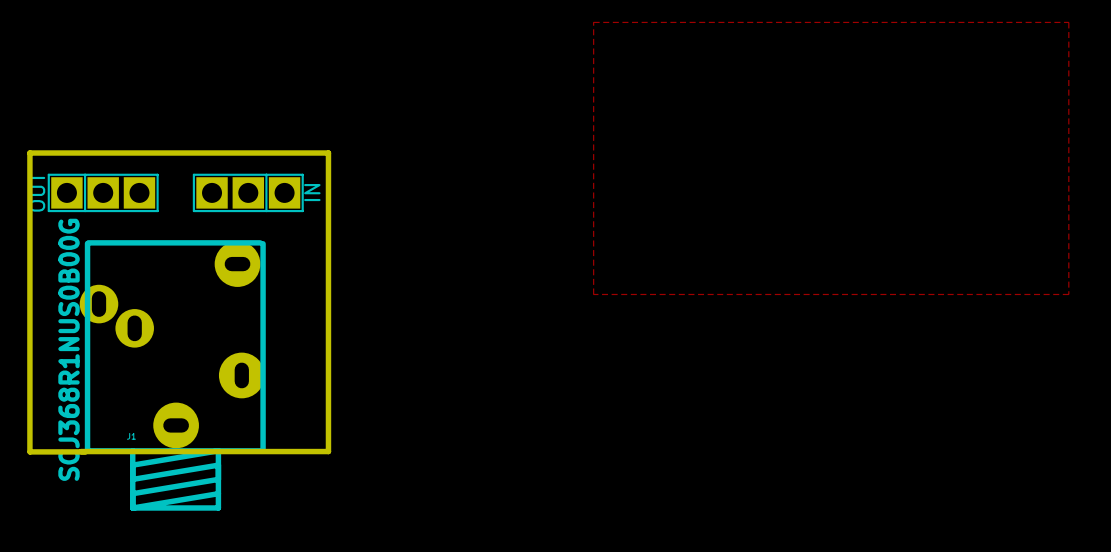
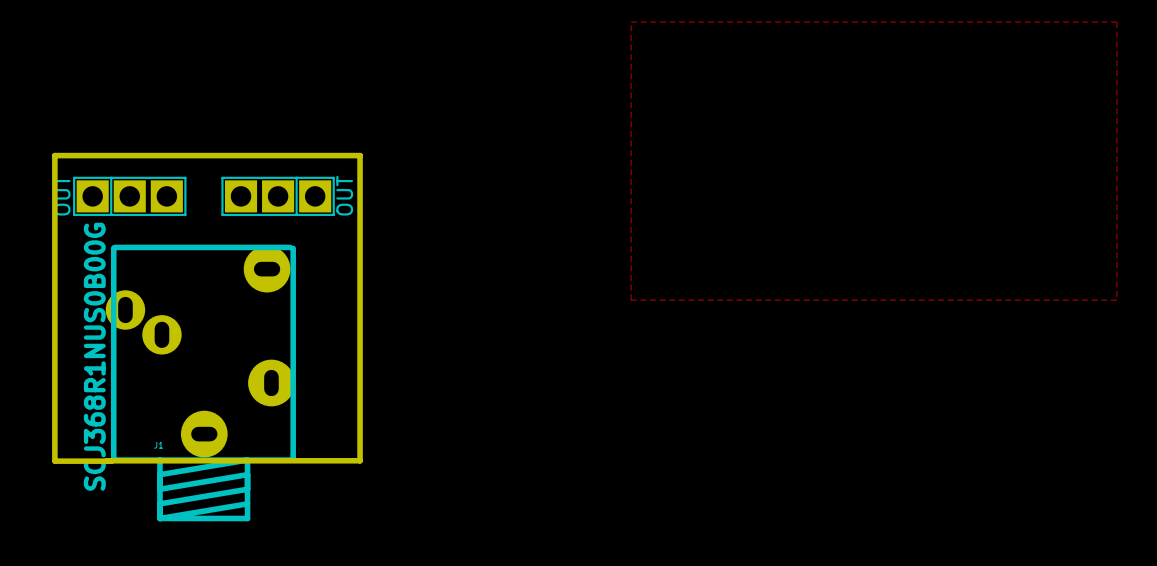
part value: IN (312, 192) -> OUT (344, 195)

